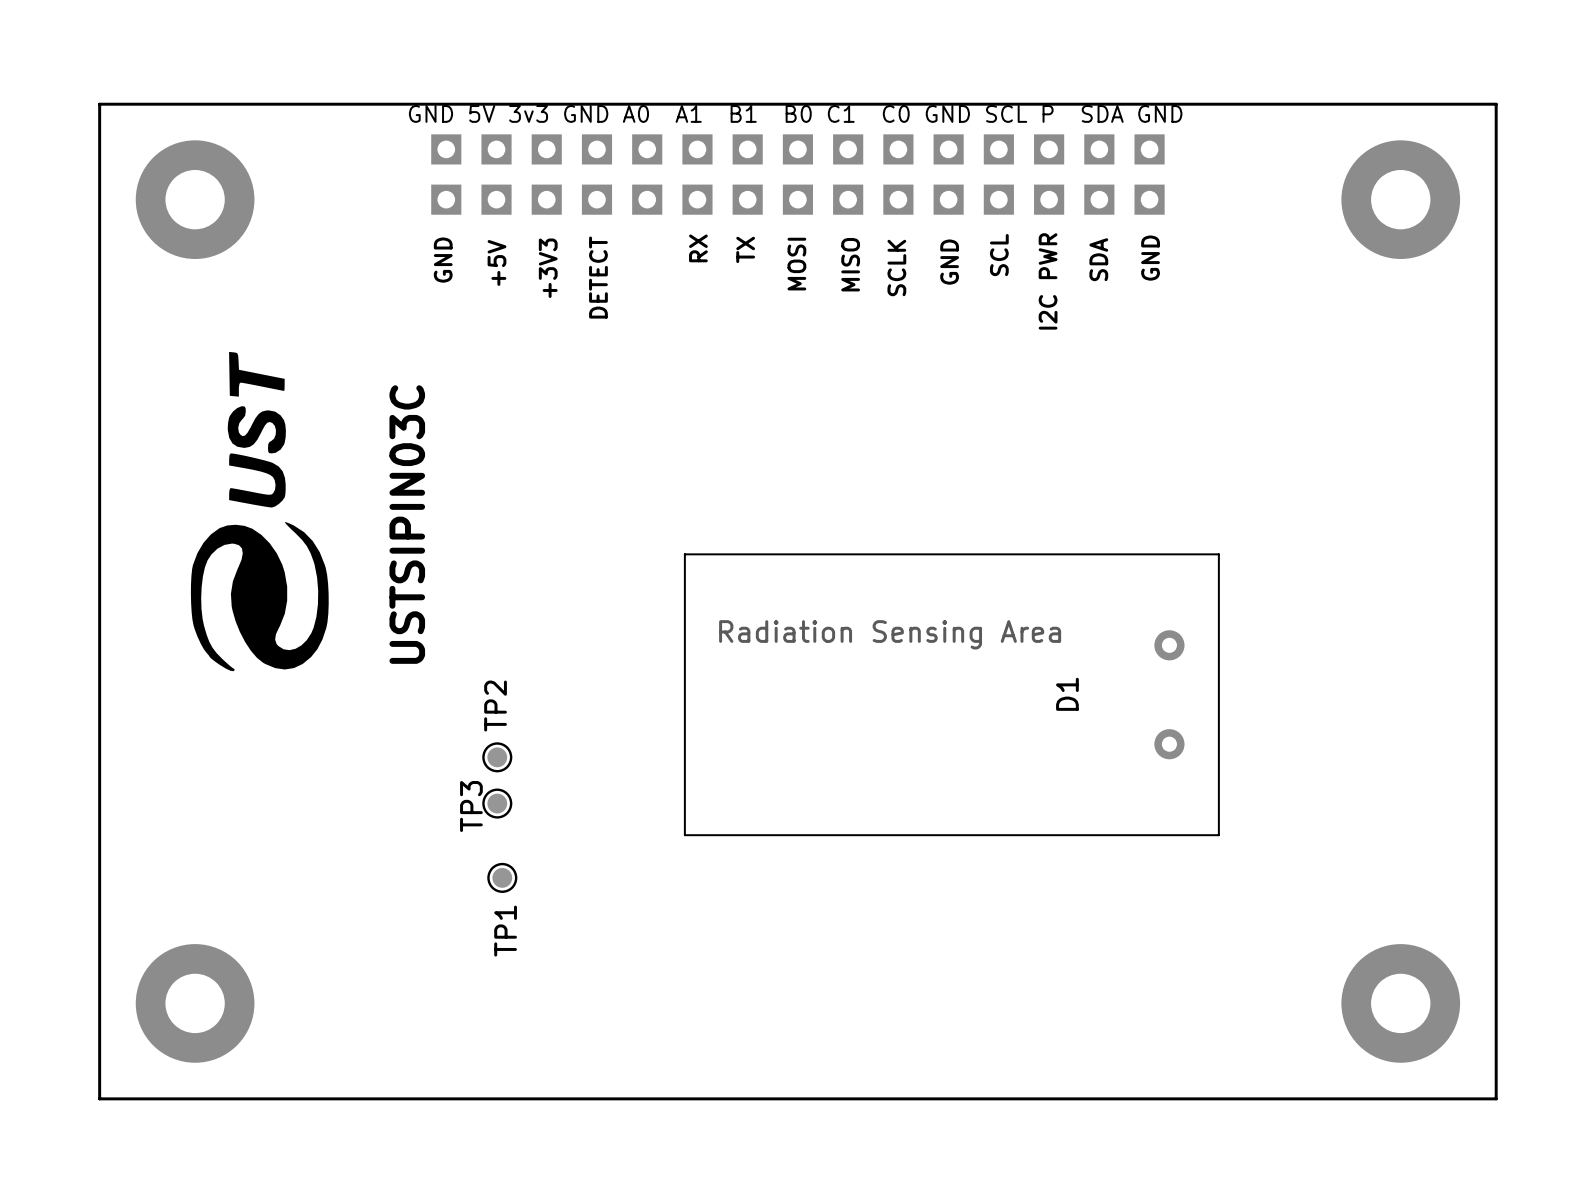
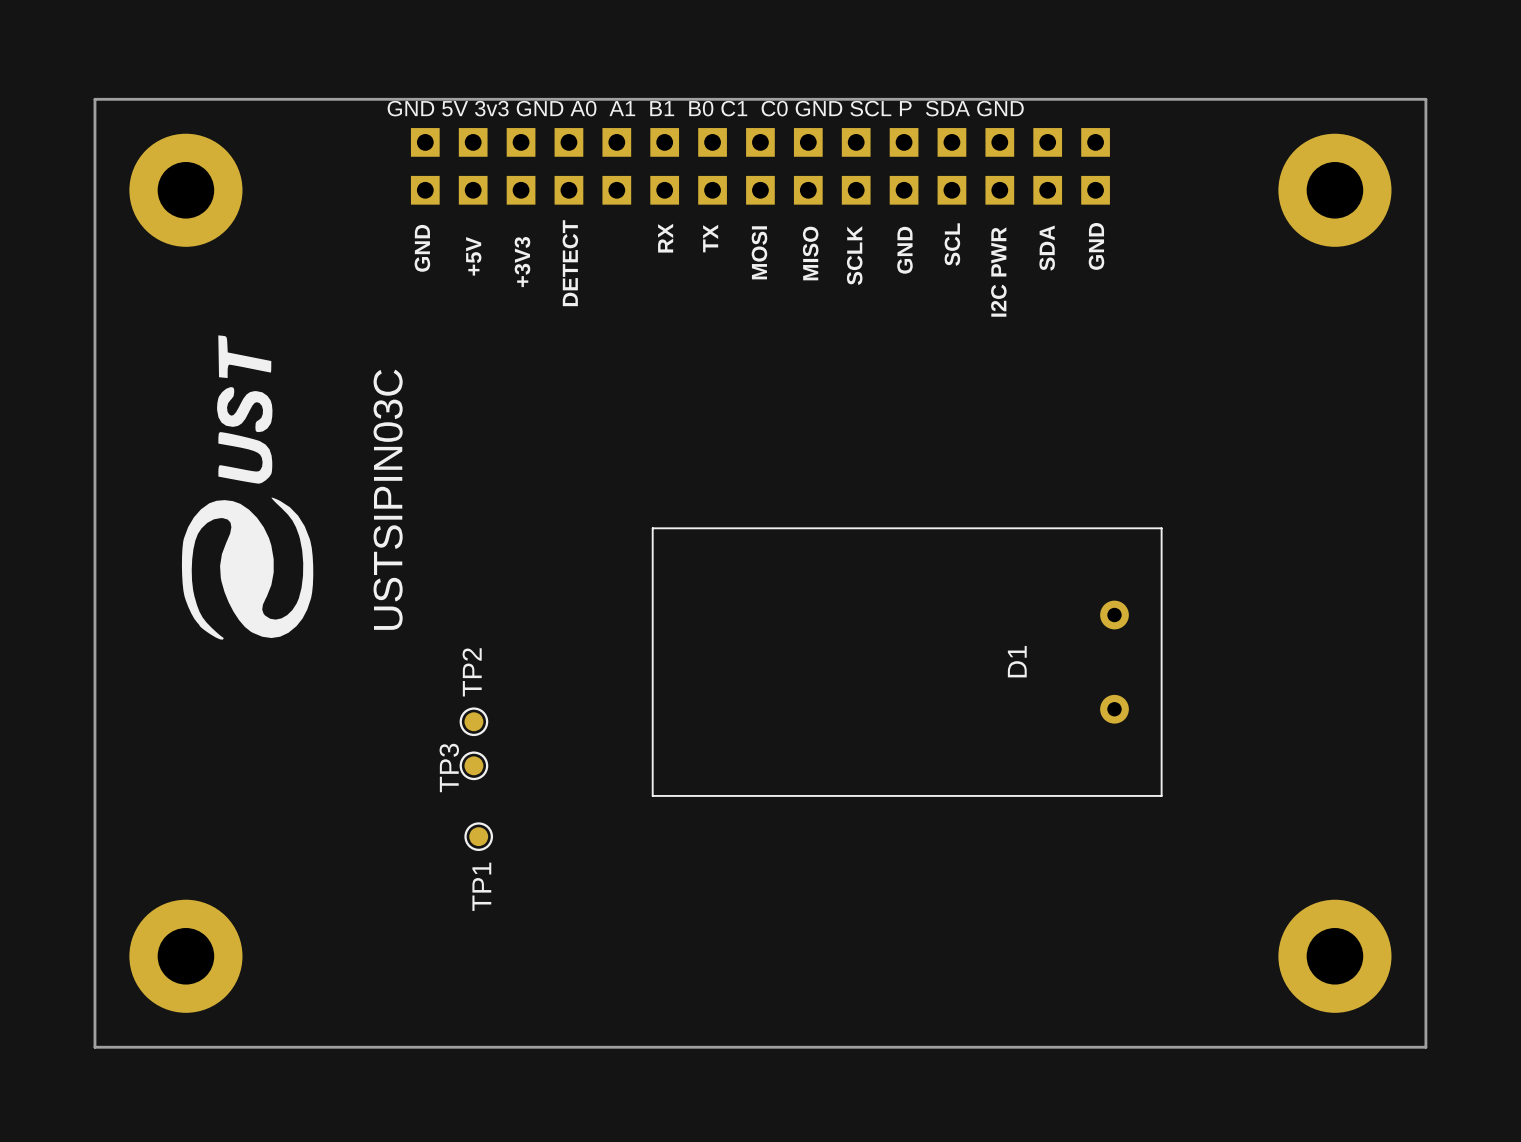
text: Radiation Sensing Area (890, 634) -> none

